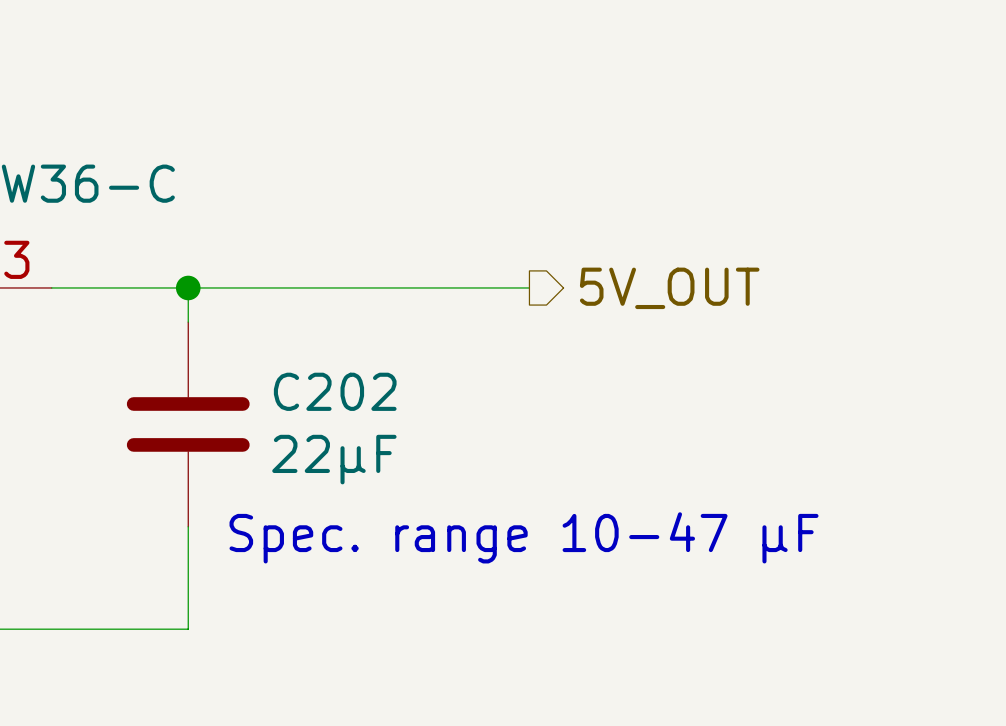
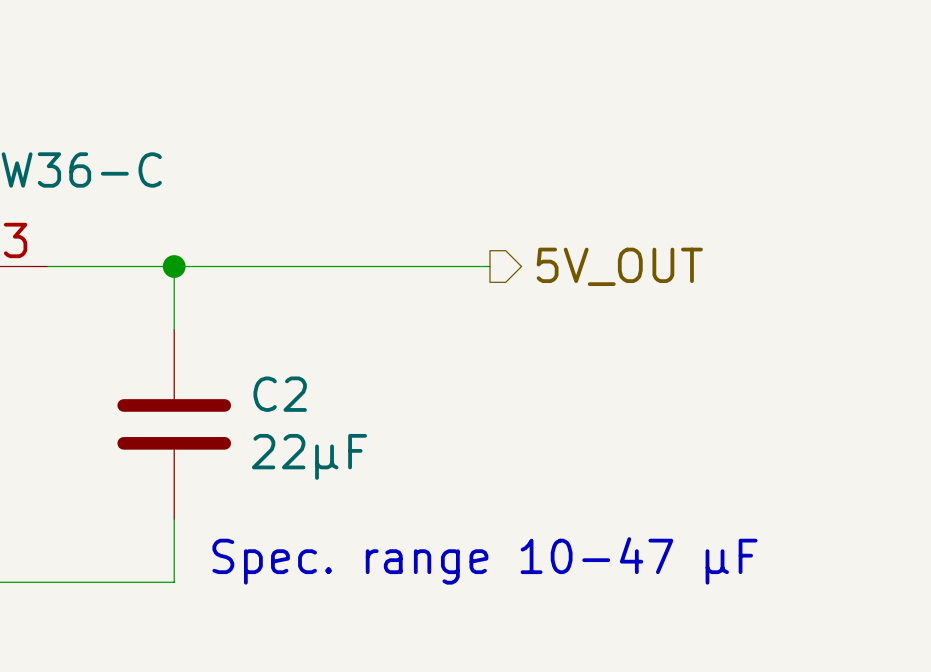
C202: 22µF (188, 424) -> none
C2: none -> 22µF (174, 424)
text position: Spec. range 10-47 µF (524, 537) -> Spec. range 10-47 µF (484, 560)

